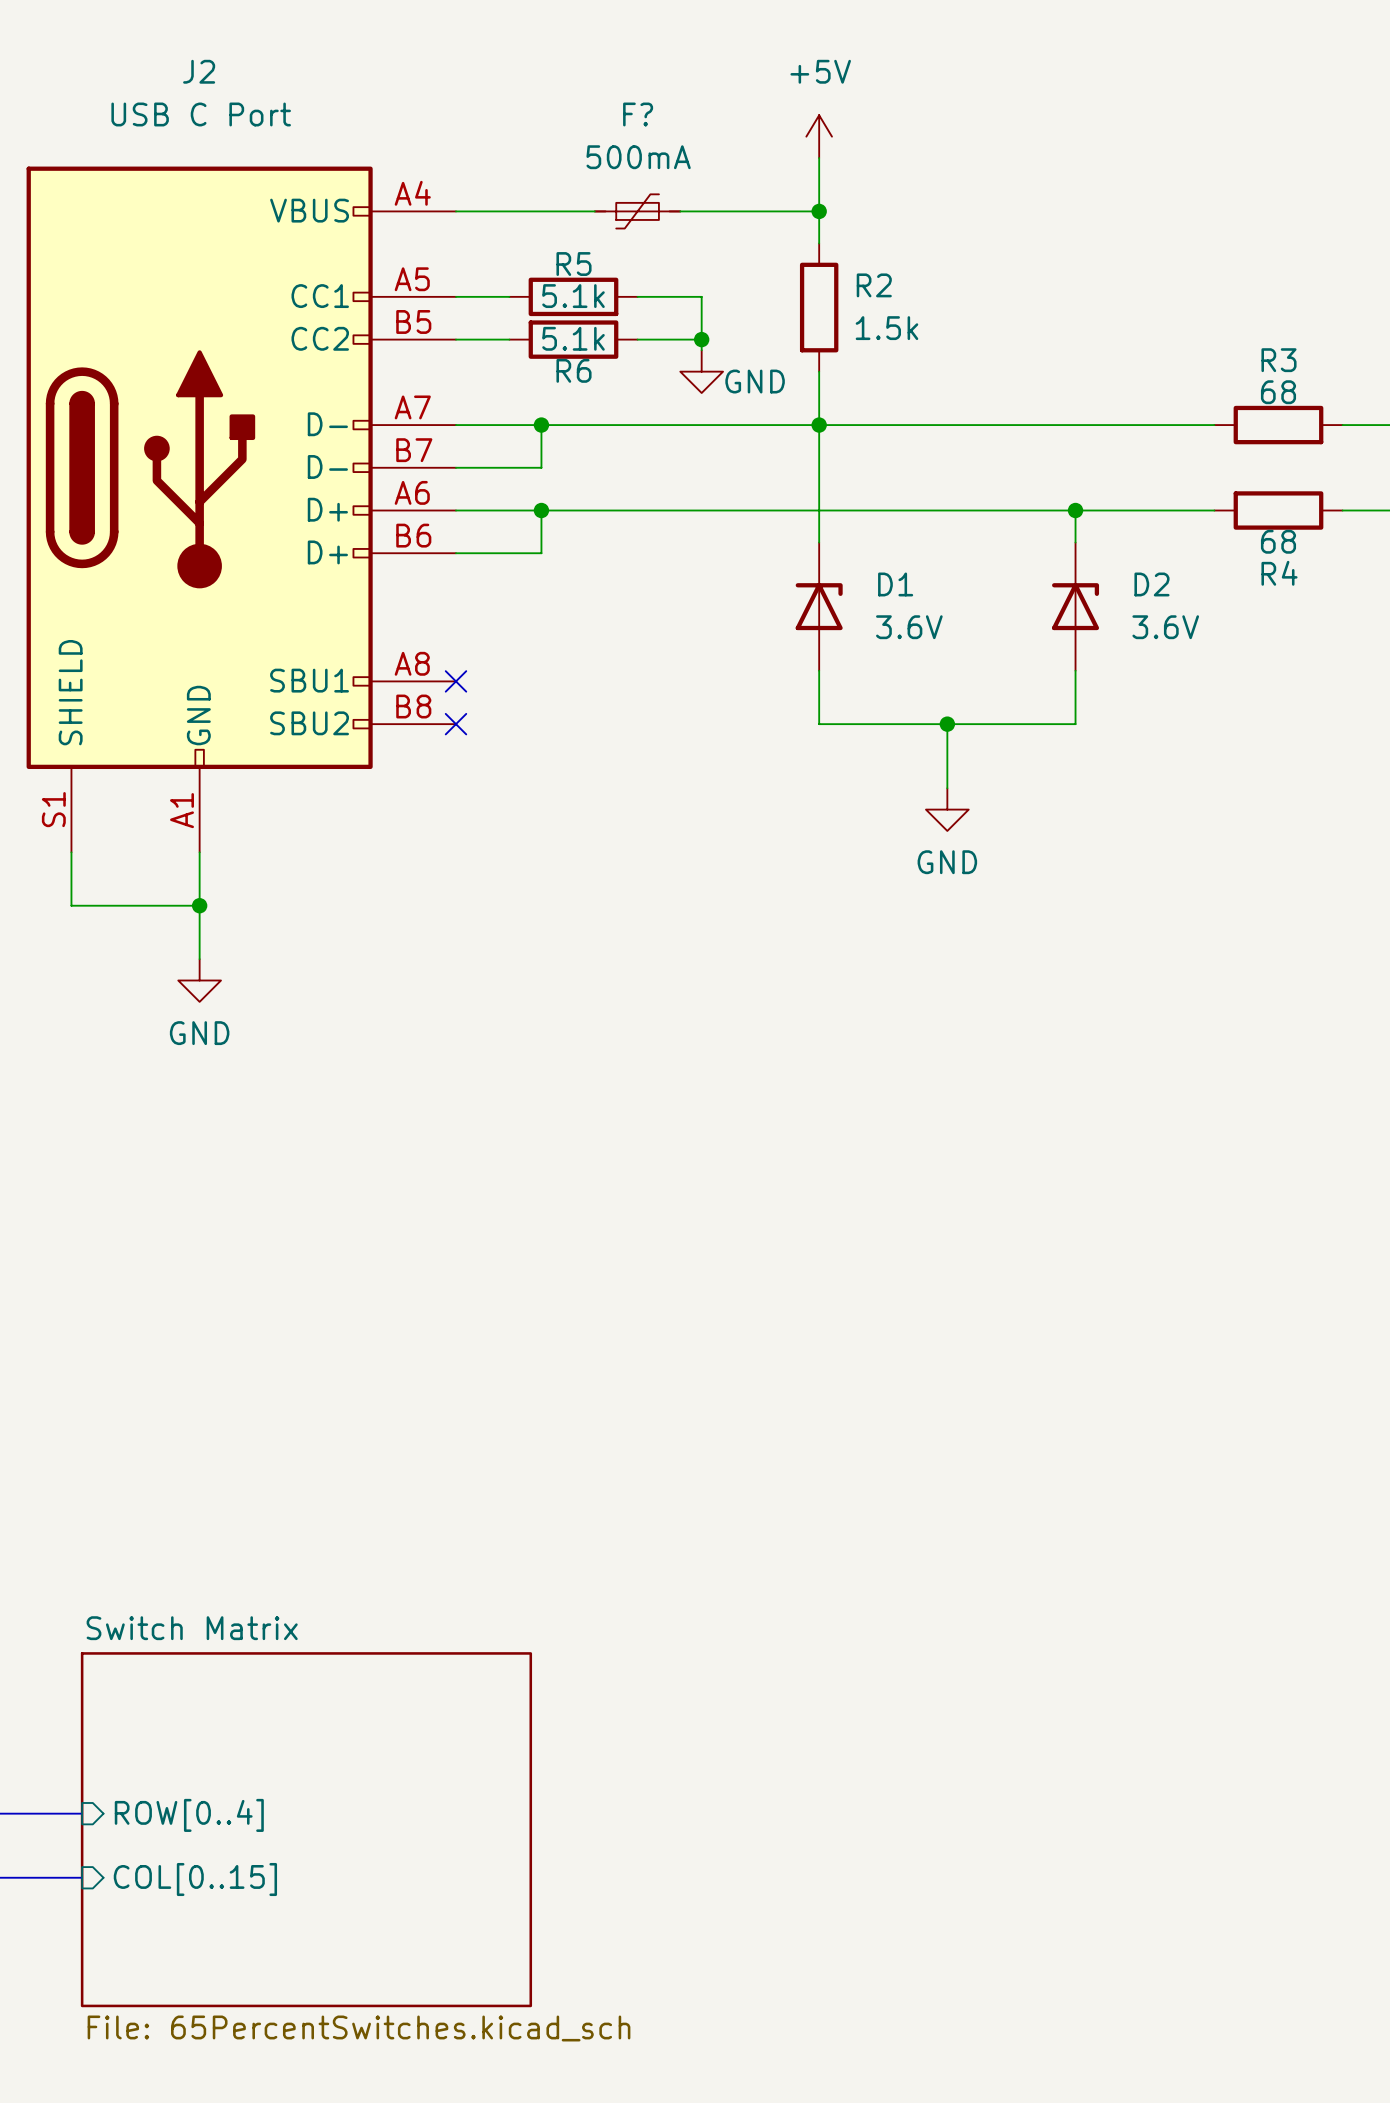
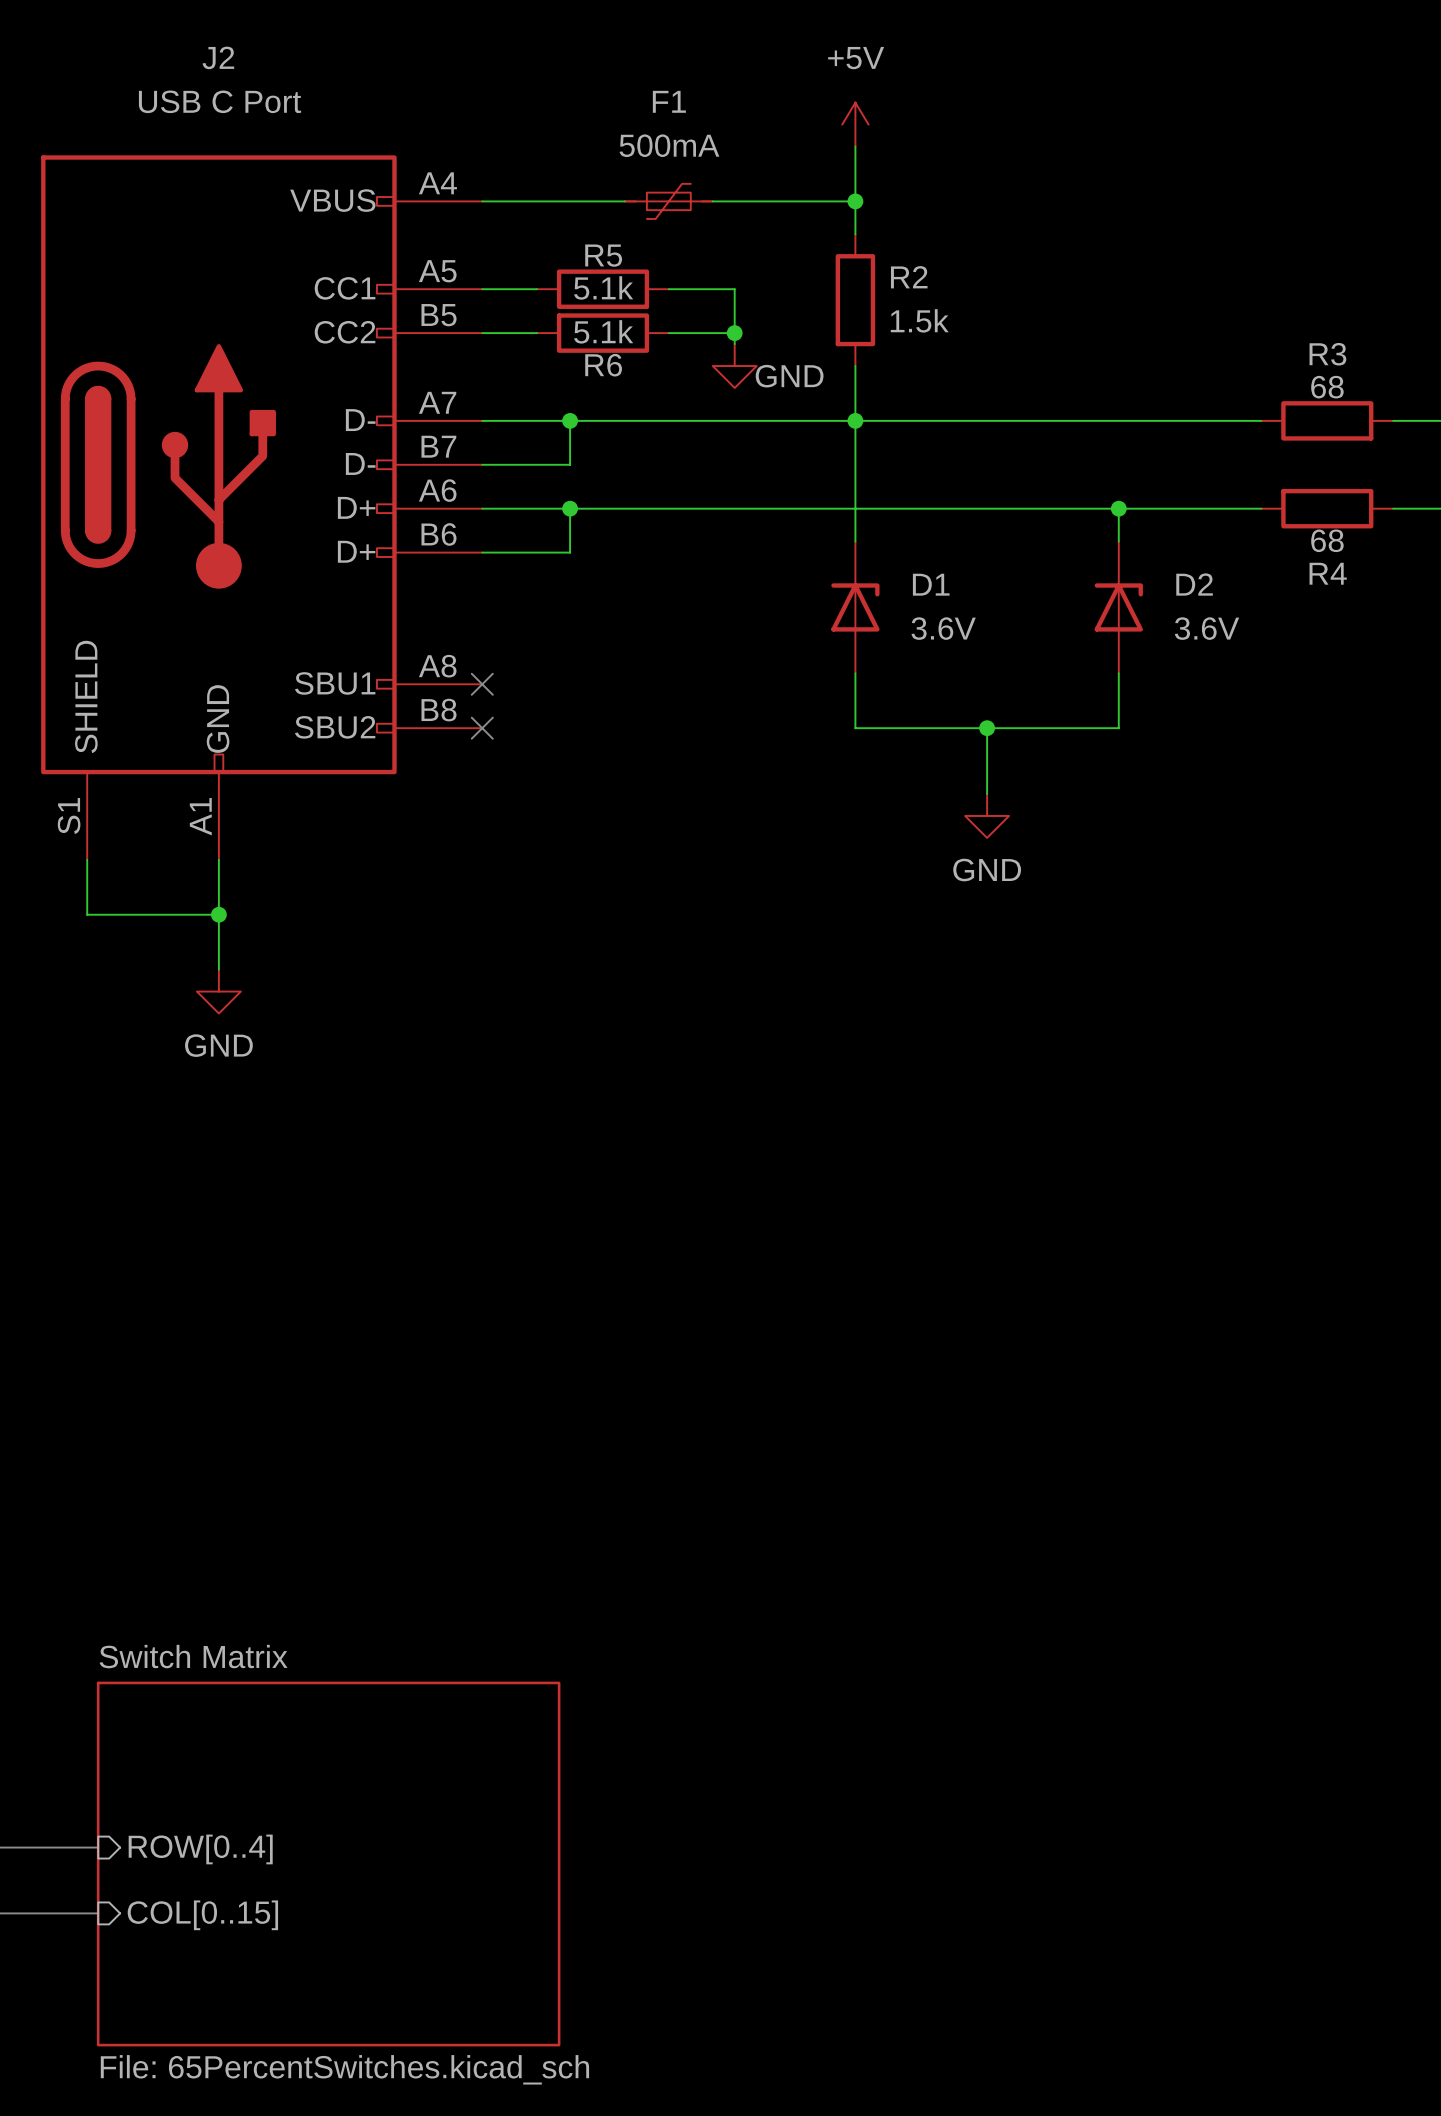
F? name: F? (638, 114) -> F1 (669, 101)

